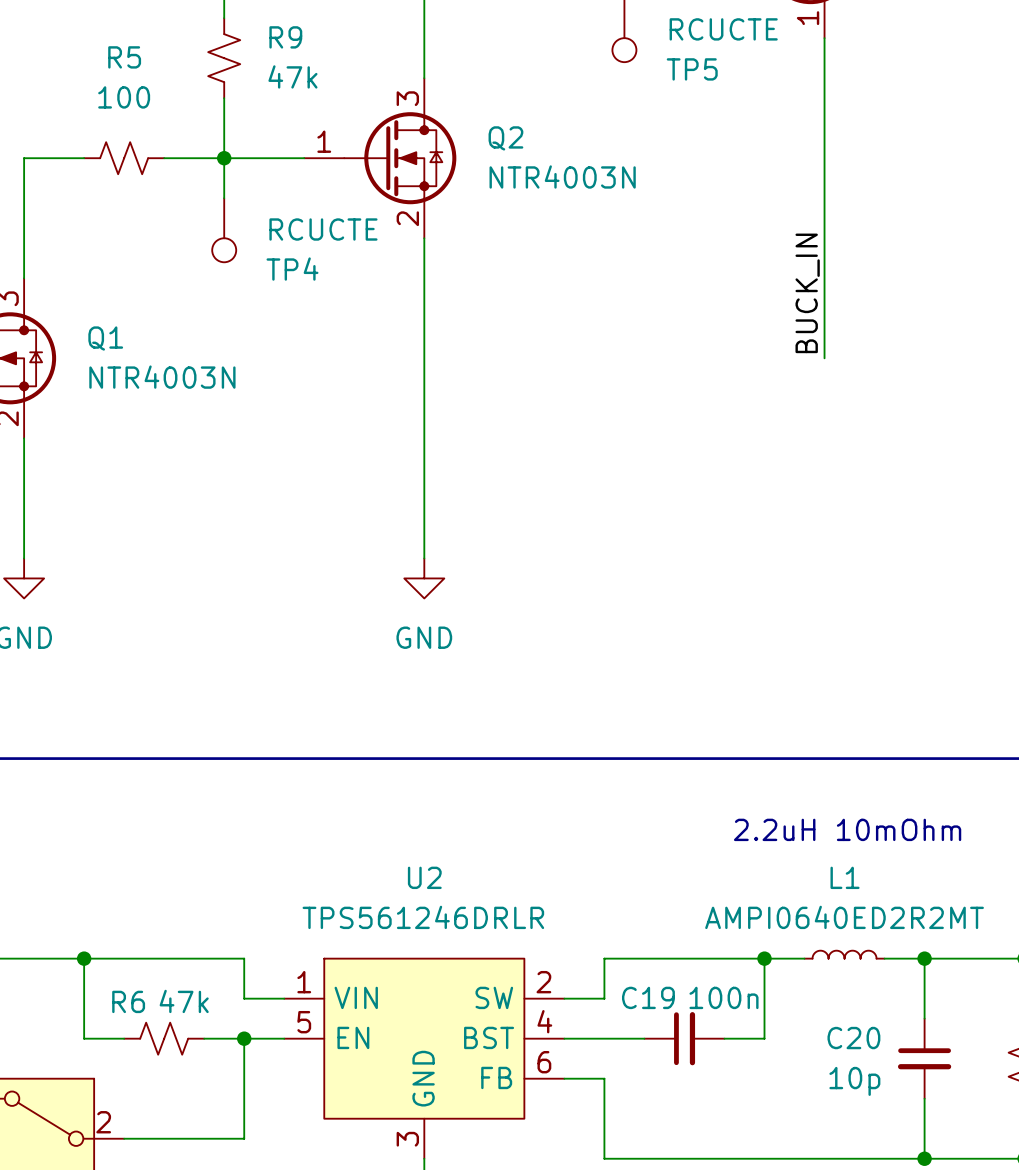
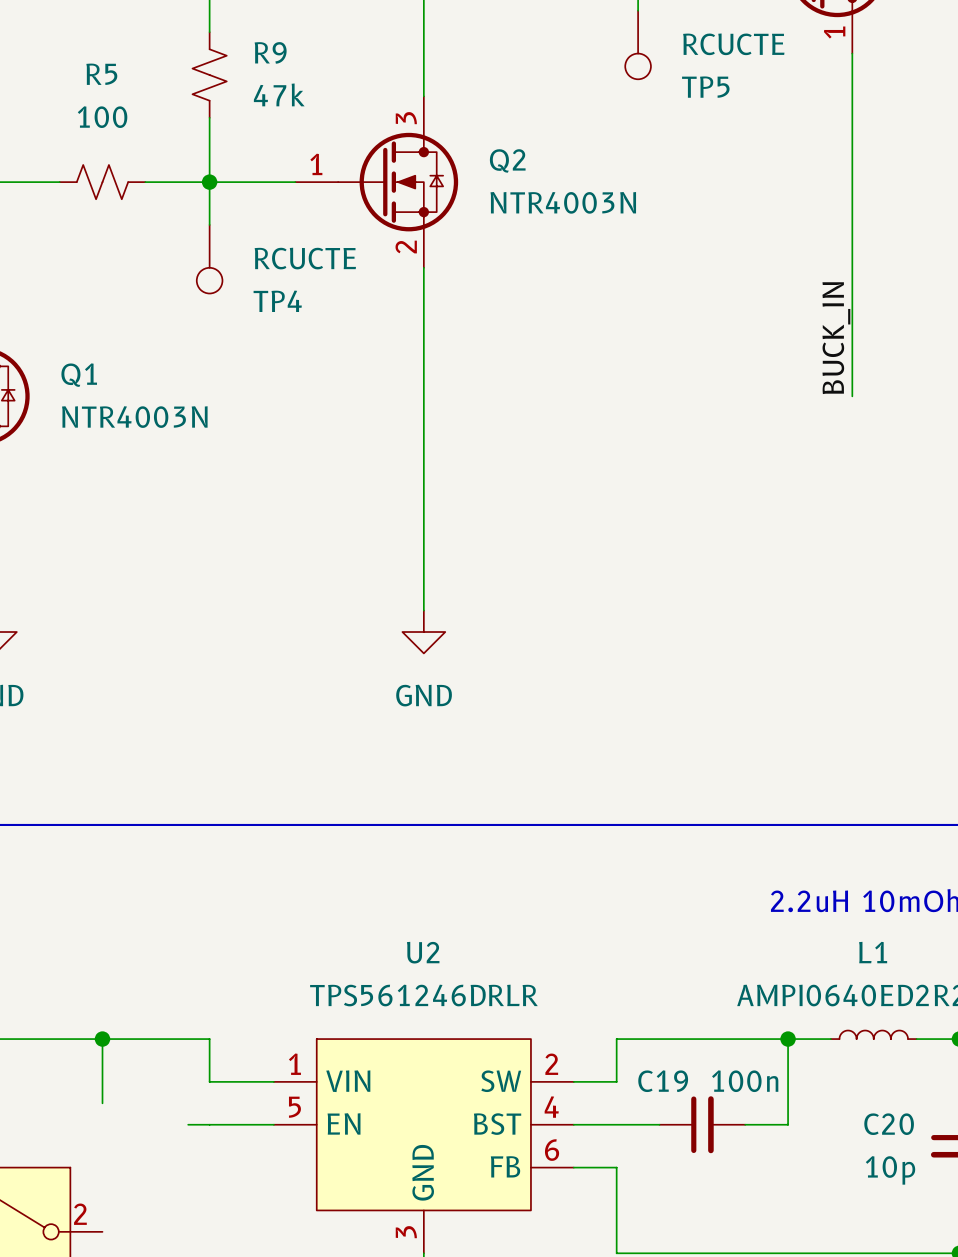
wire: (84, 958) (84, 1038) (124, 1038) -> none
junction position: (84, 958) -> (102, 1039)
wire: none -> (102, 1039) (102, 1103)
wire: (224, 958) (244, 958) (244, 998) -> (209, 1039) (209, 1081) (231, 1081)
R6: 47k (164, 1038) -> none
wire: (244, 1038) (244, 1138) (124, 1138) -> none
junction: (244, 1038) -> none

